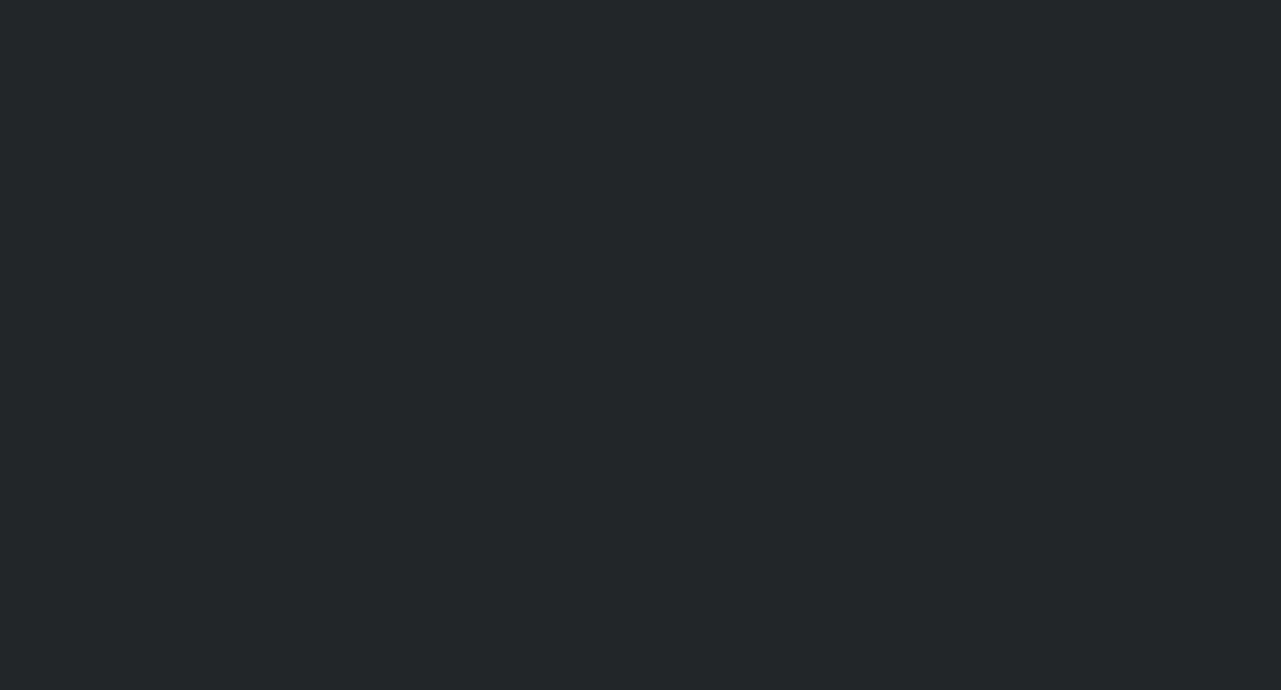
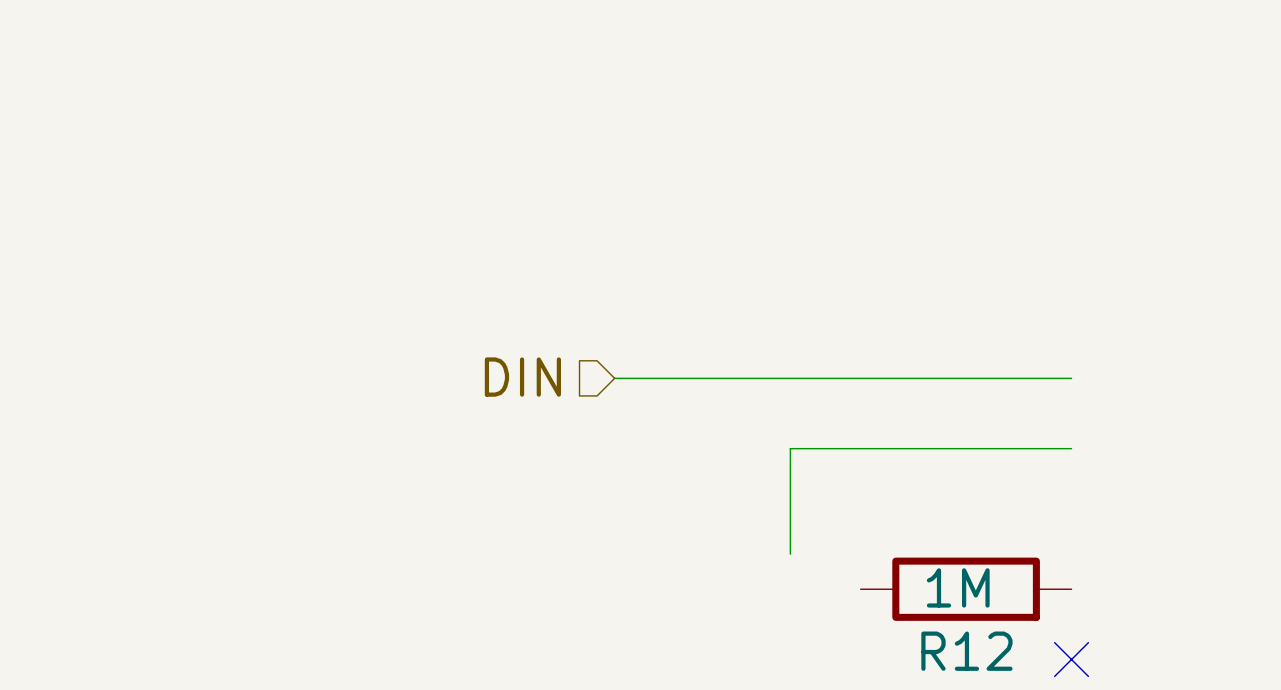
hierarchical label: none -> DIN (522, 377)
wire: none -> (614, 378) (1071, 378)
wire: none -> (1071, 448) (790, 448) (790, 554)
R12: none -> 1M (966, 589)
no-connect mark: none -> (1071, 659)

